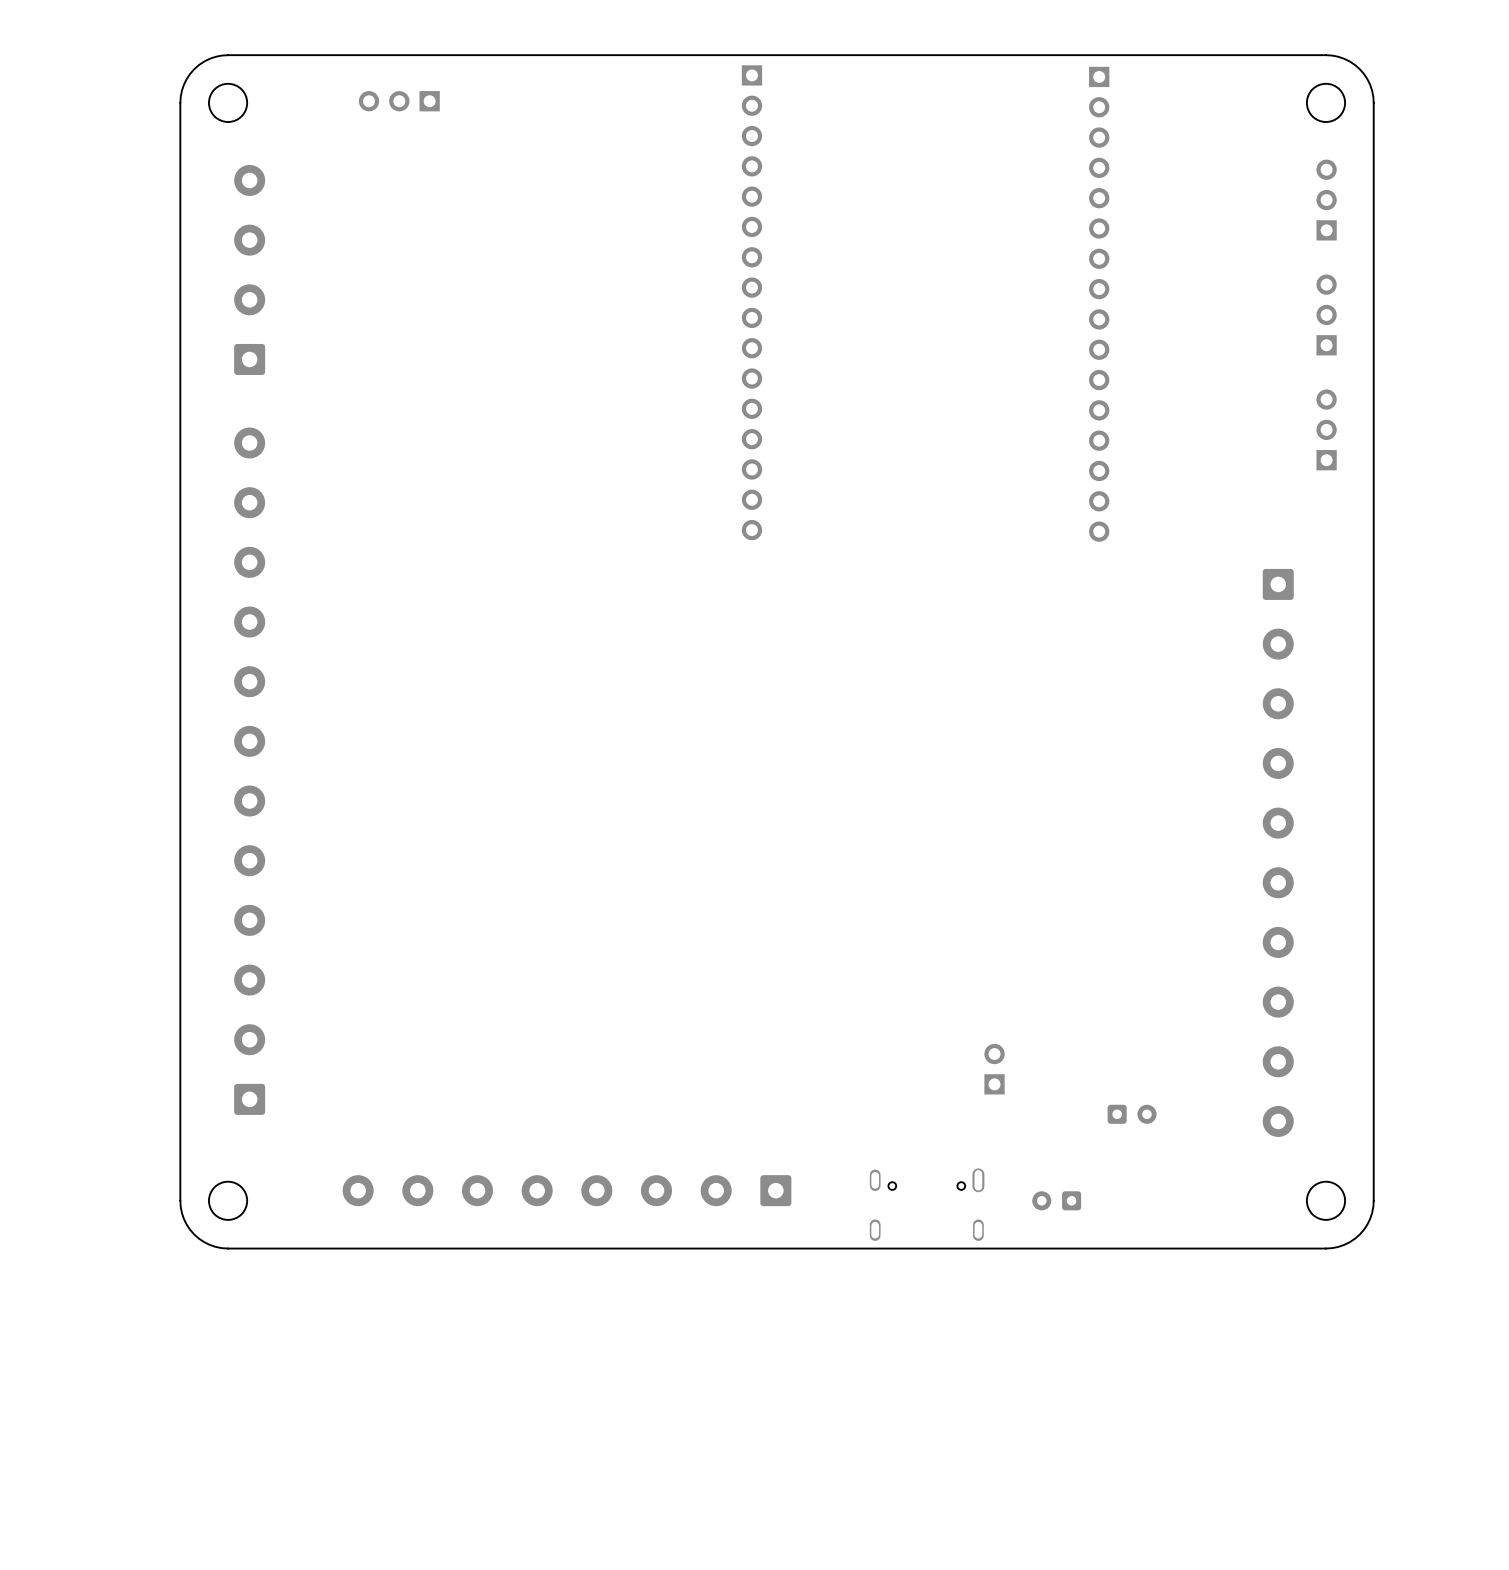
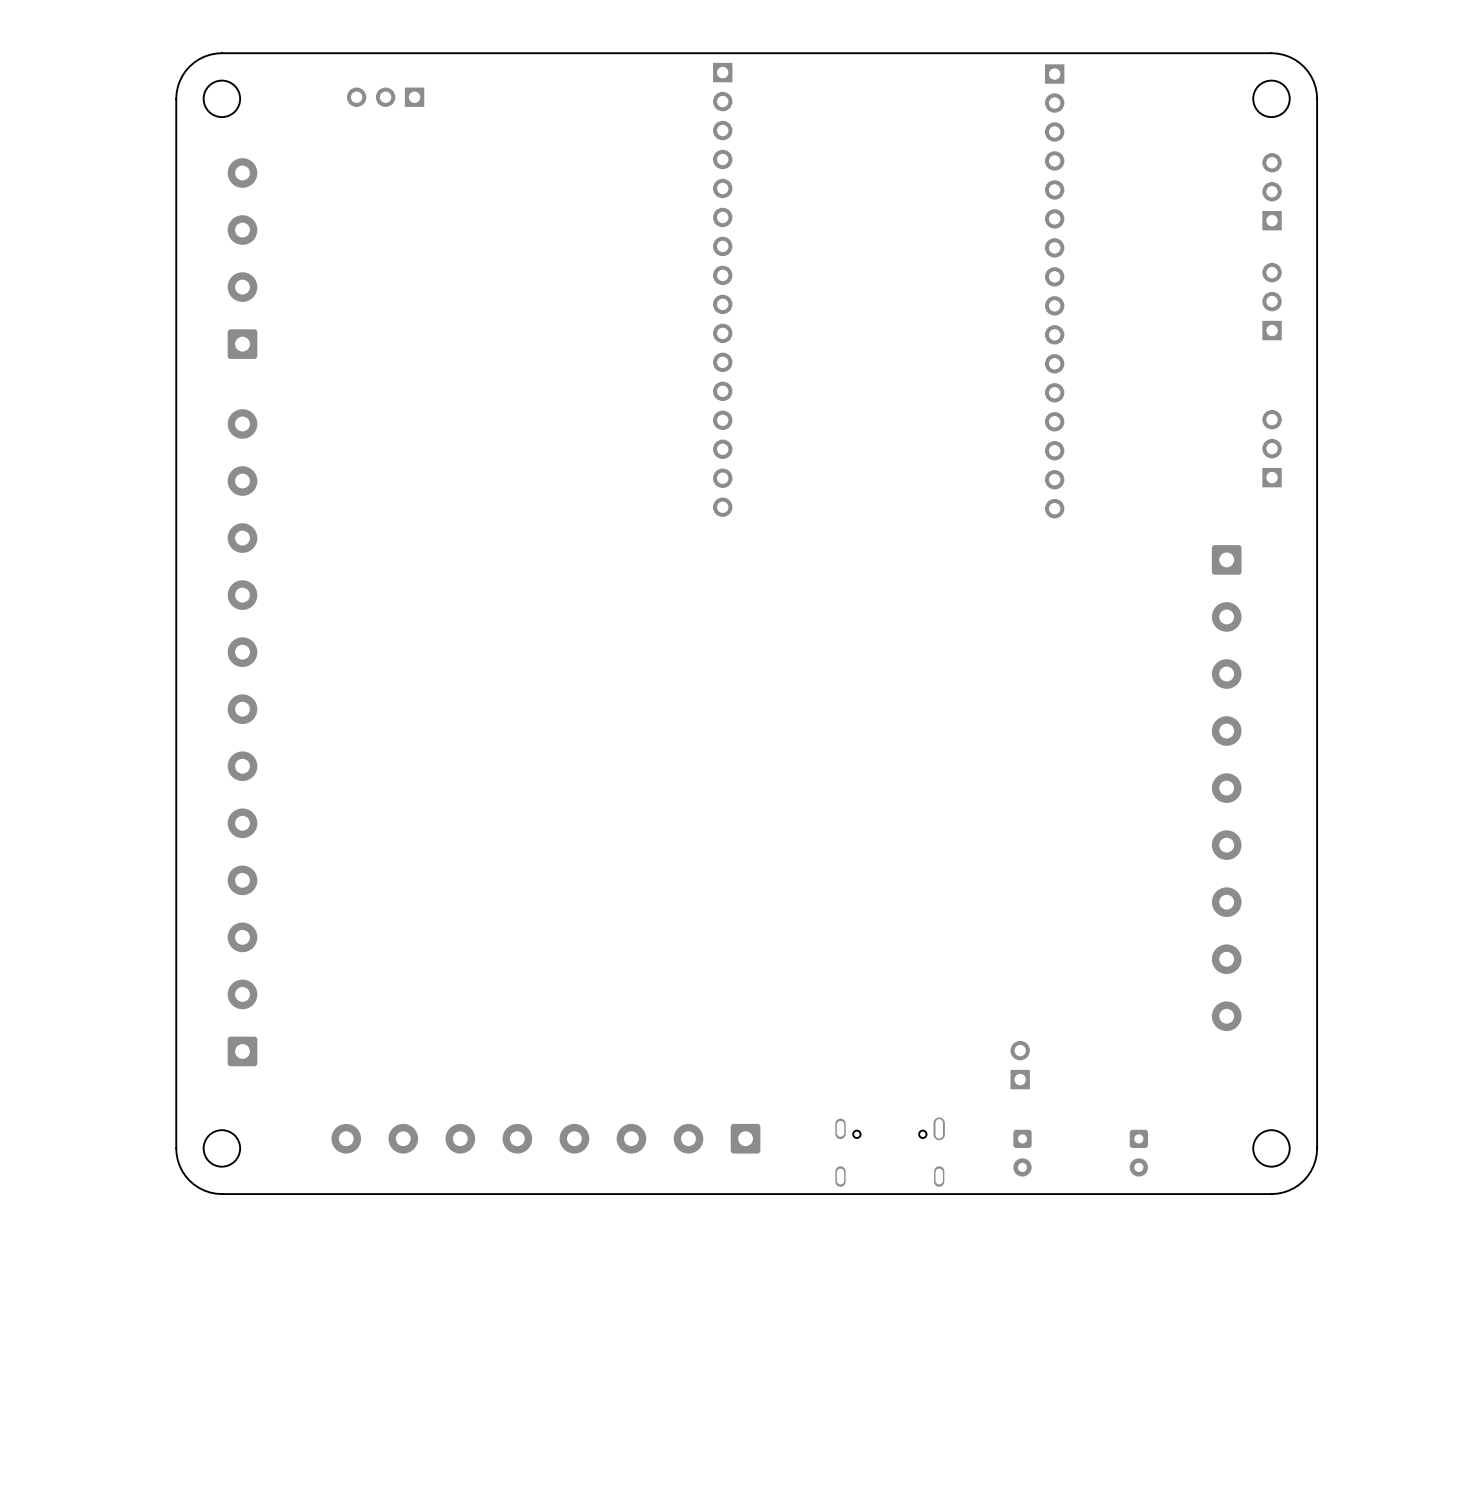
part position: (1326, 429) -> (1272, 448)
part: none -> (1226, 788)
part: (1278, 852) -> none
part position: (994, 1069) -> (1020, 1065)
part rotation: 0° (1132, 1114) -> 90° clockwise (1138, 1153)
part position: (1132, 1114) -> (1138, 1153)
part rotation: 0° (1056, 1200) -> 90° counterclockwise (1022, 1153)

